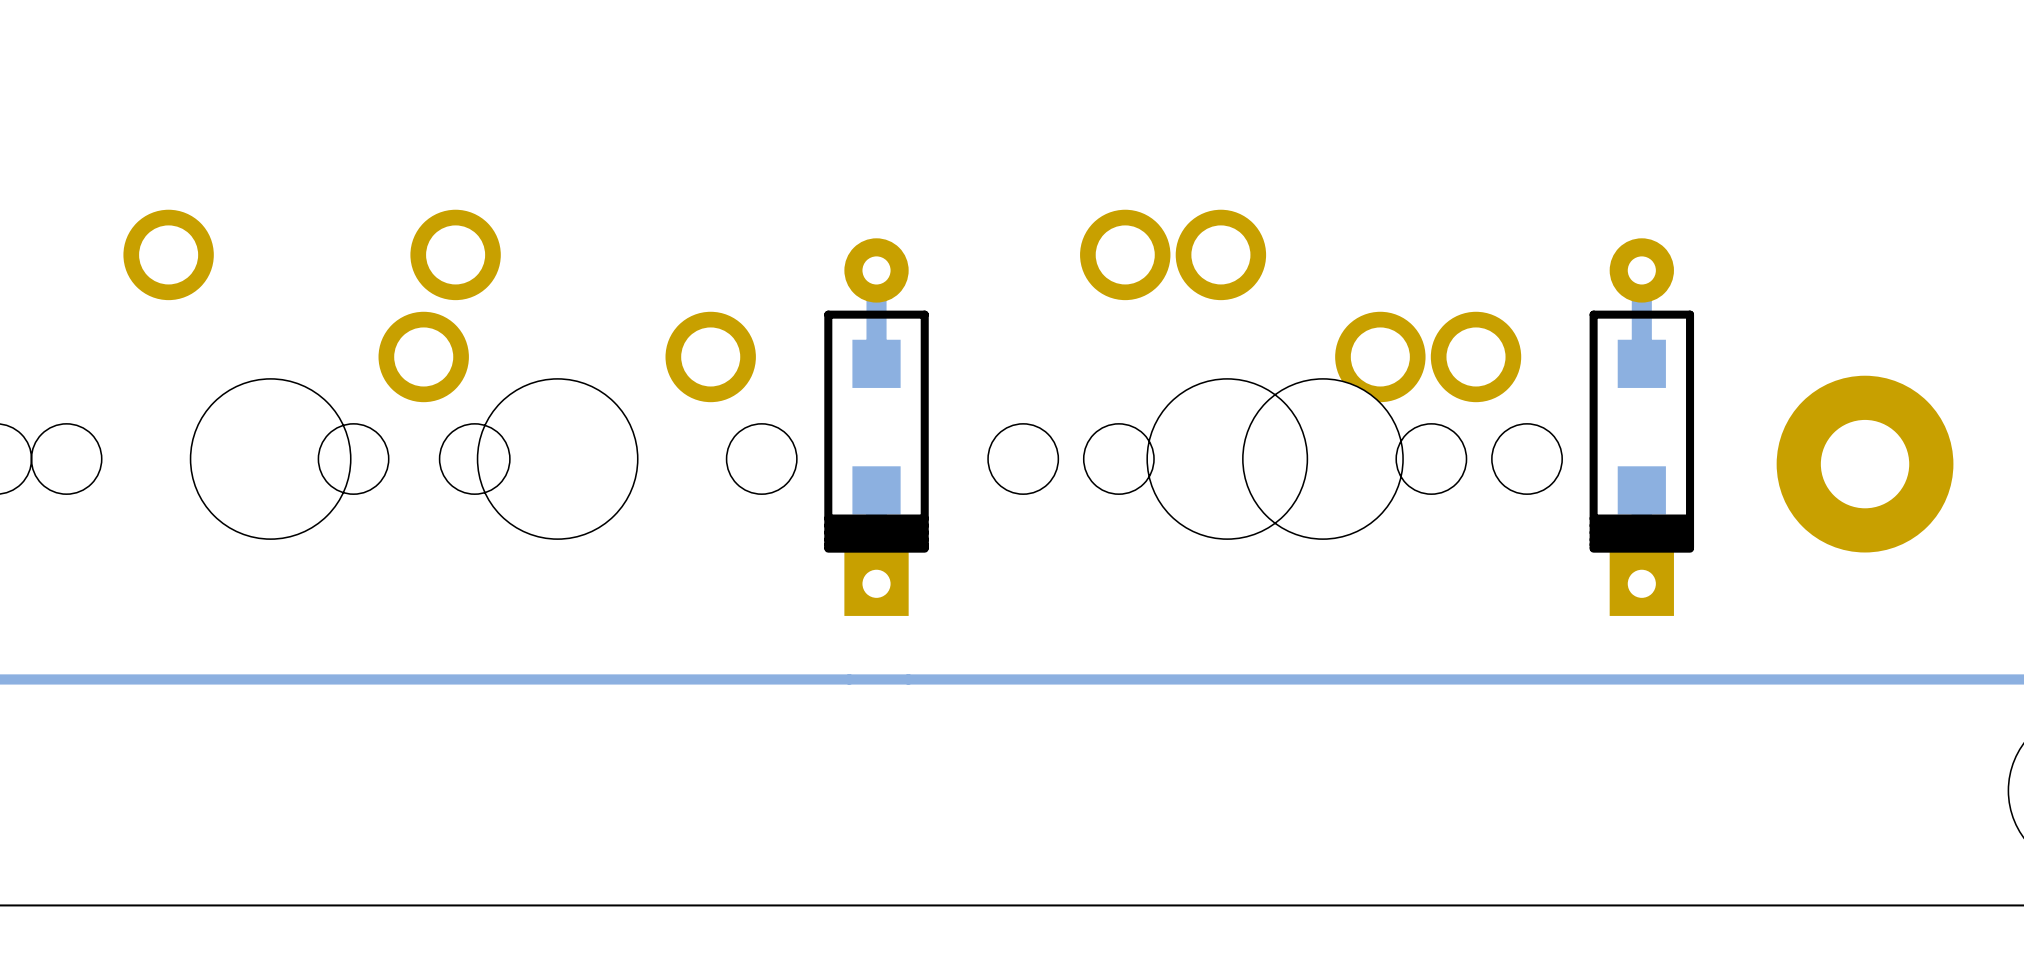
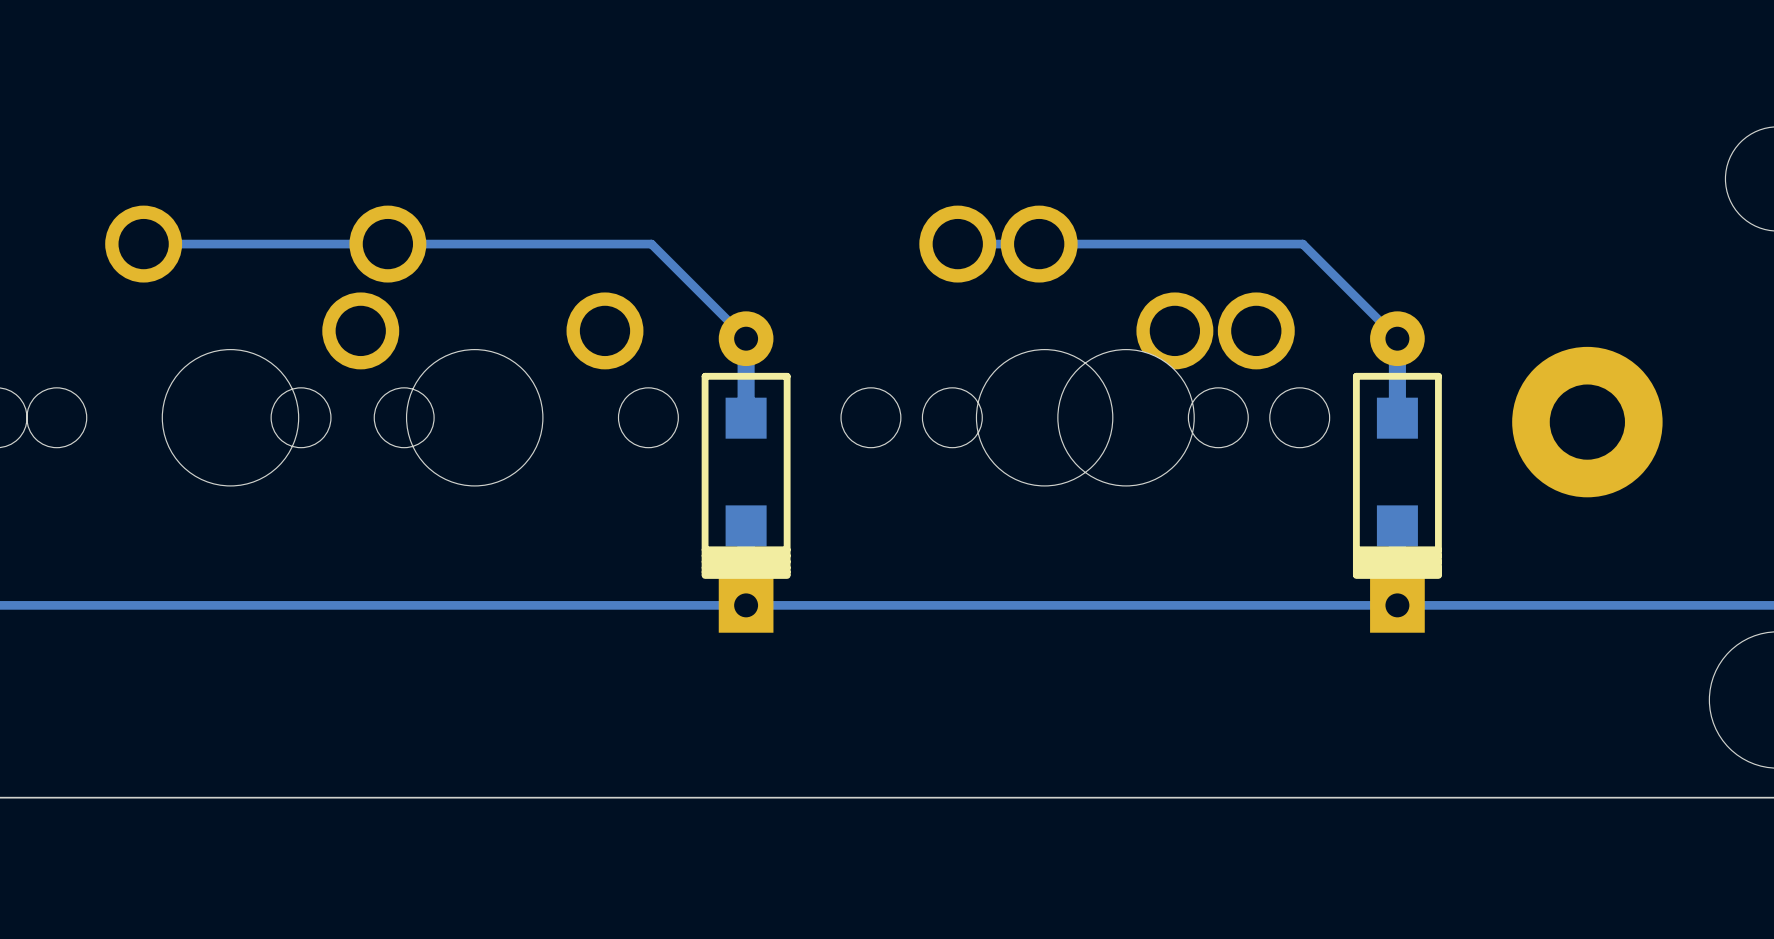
track: none -> (143, 244) (651, 244) (746, 338)
track: none -> (957, 244) (1302, 244) (1397, 338)
part position: (876, 427) -> (746, 472)
part position: (1641, 427) -> (1397, 472)

